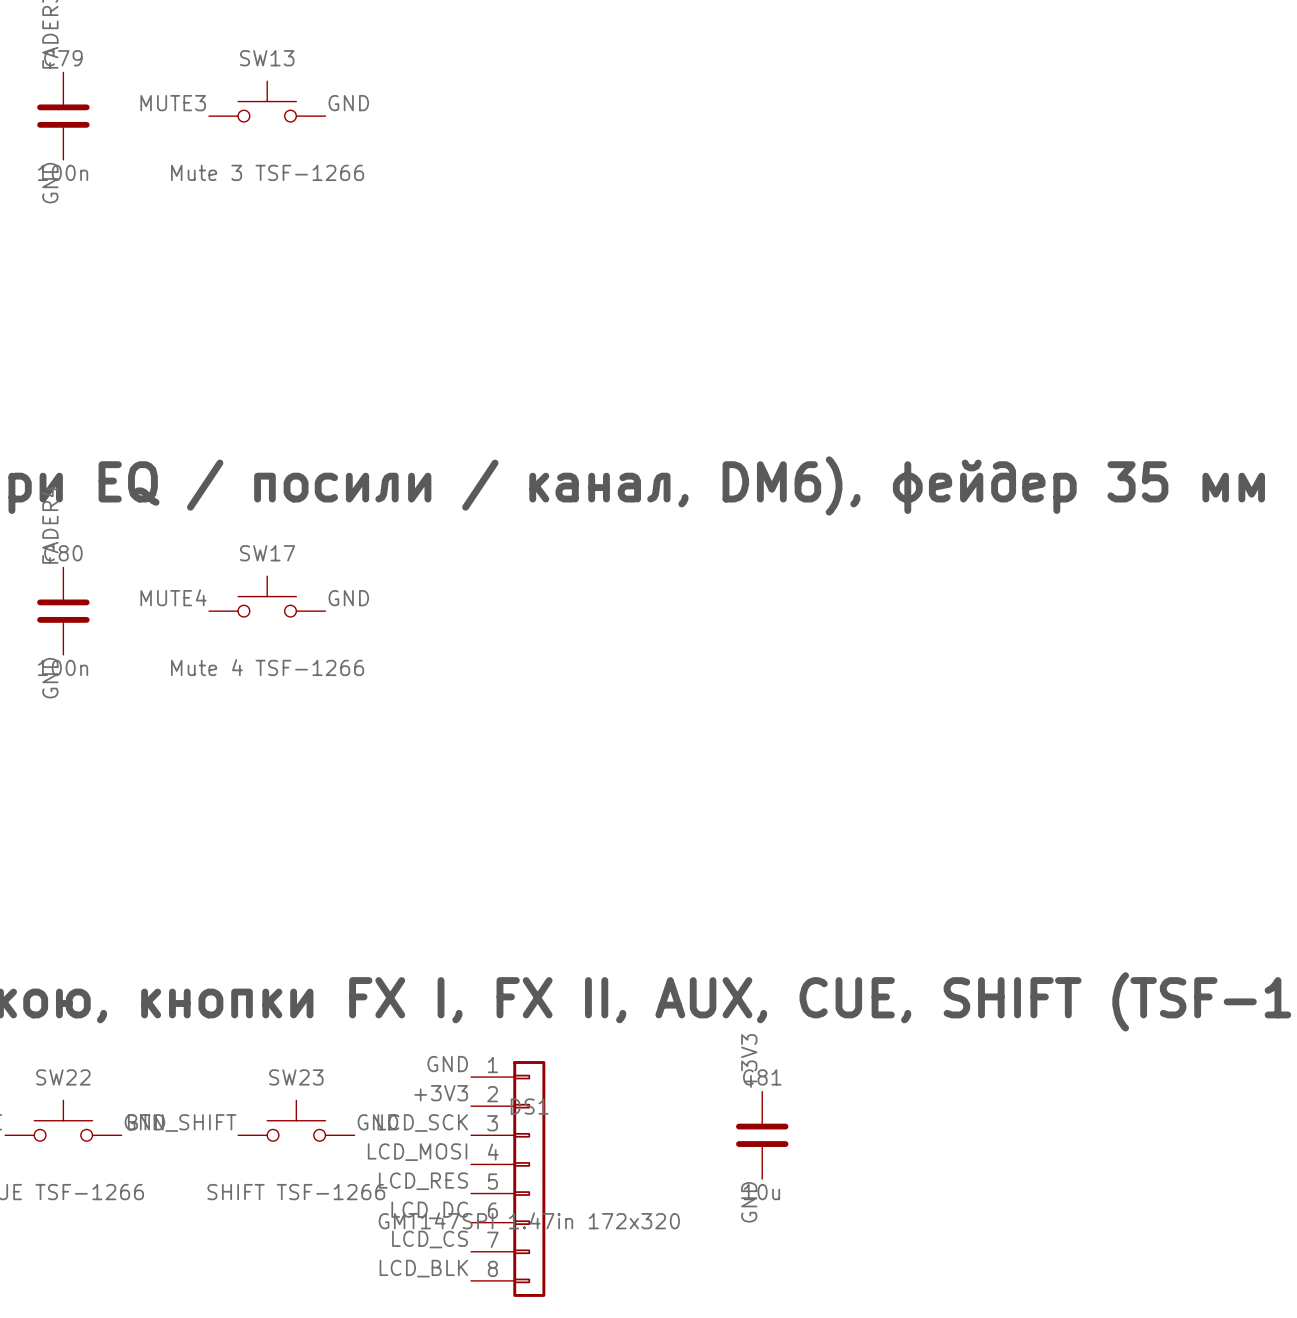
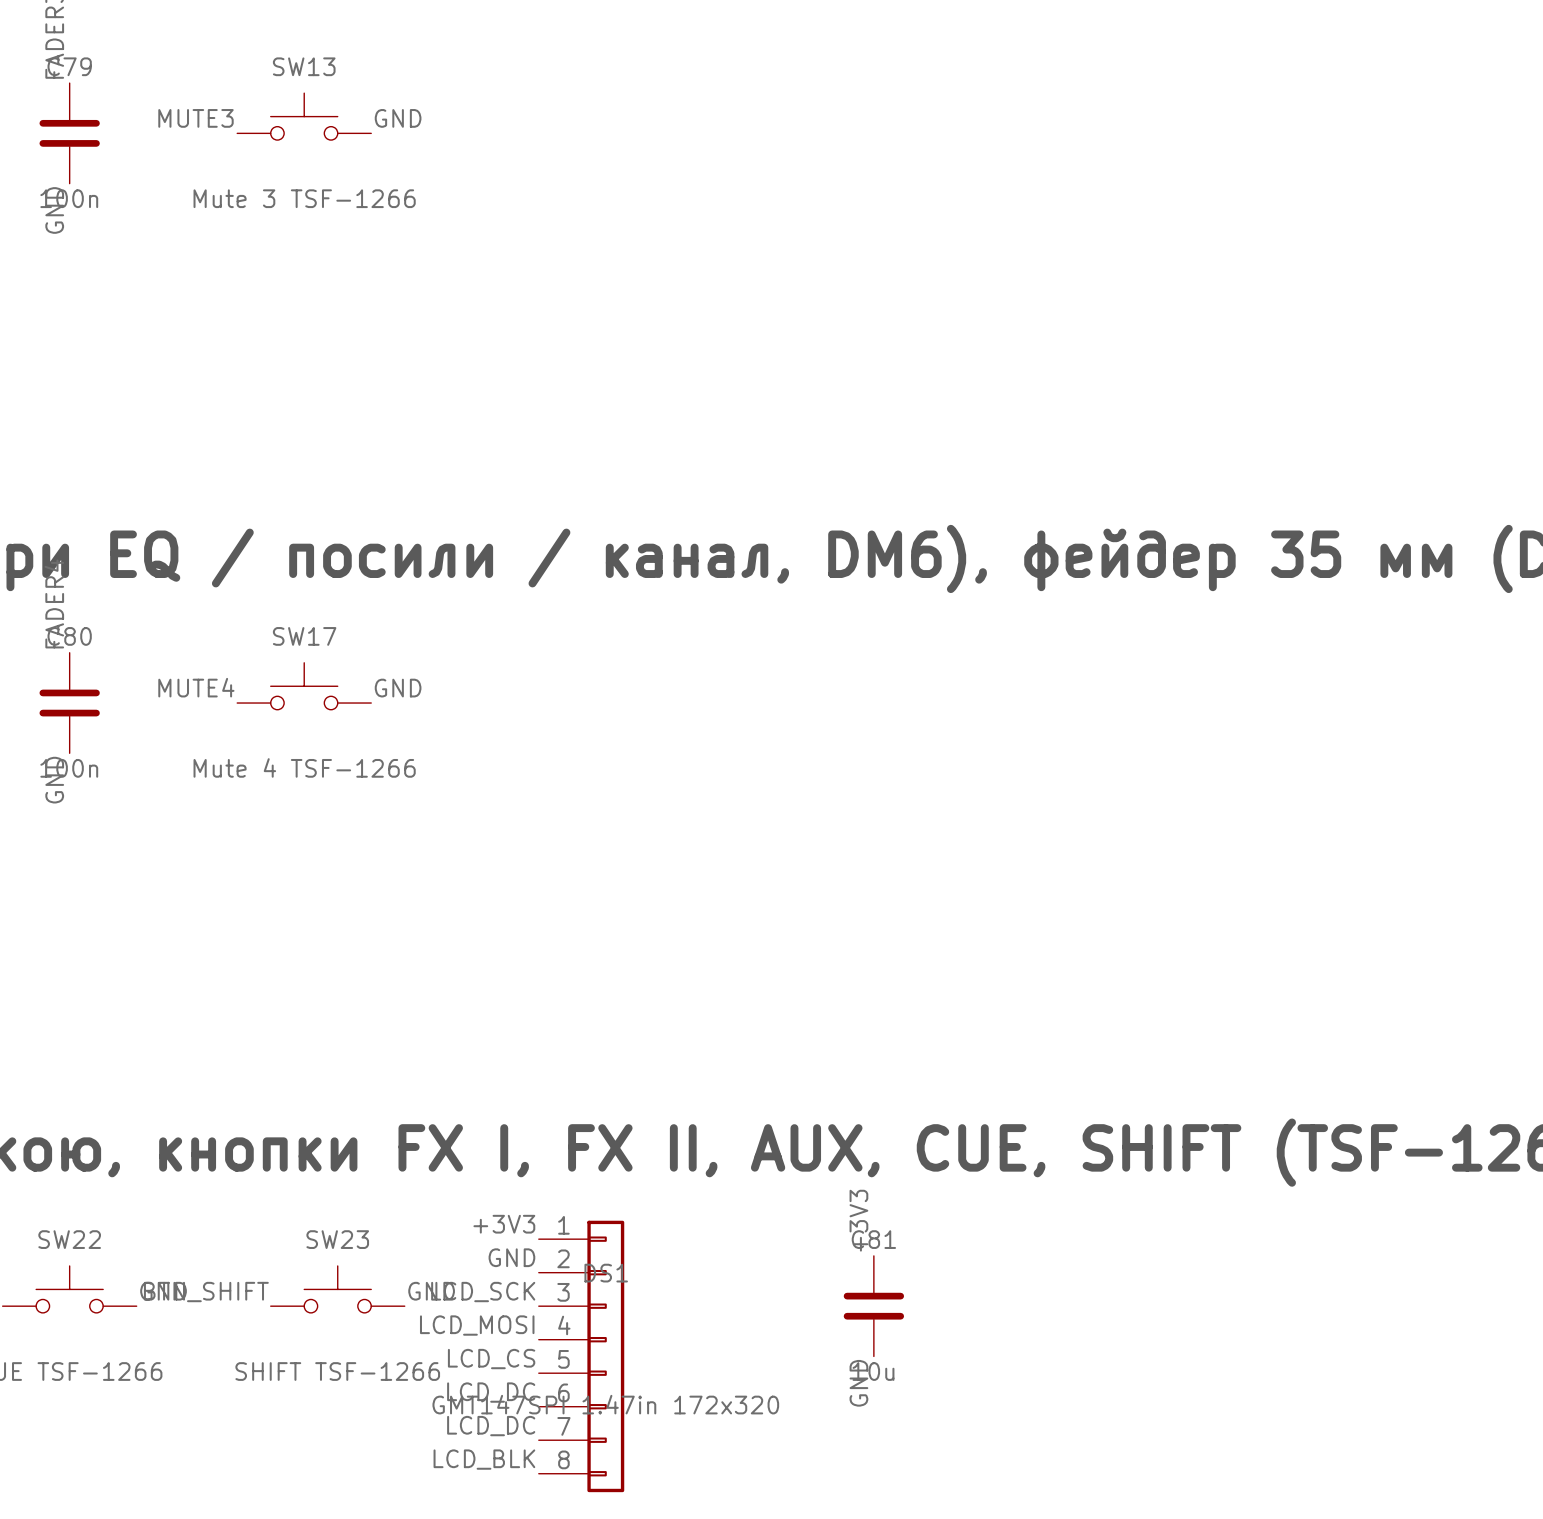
label: GND (447, 1064) -> +3V3 (504, 1224)
label: +3V3 (441, 1093) -> GND (511, 1257)
label: LCD_RES (423, 1181) -> LCD_CS (491, 1359)
label: LCD_CS (430, 1239) -> LCD_DC (491, 1426)

